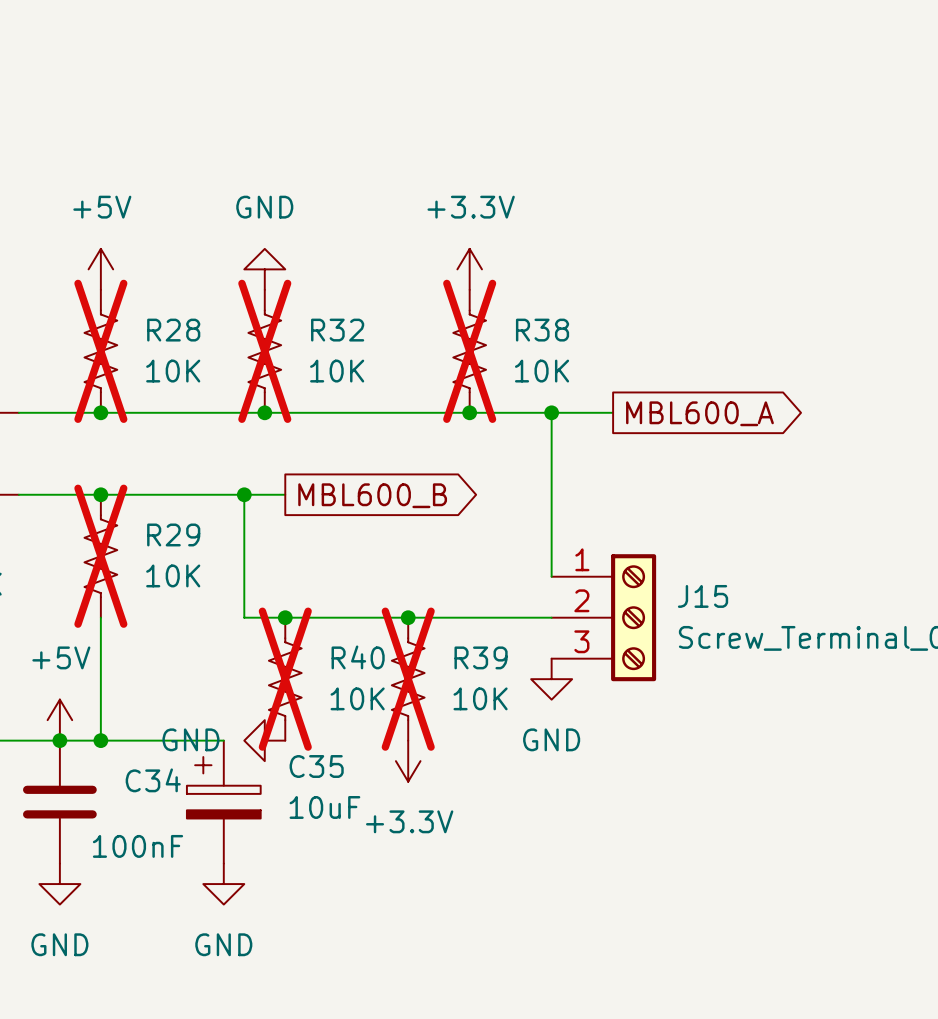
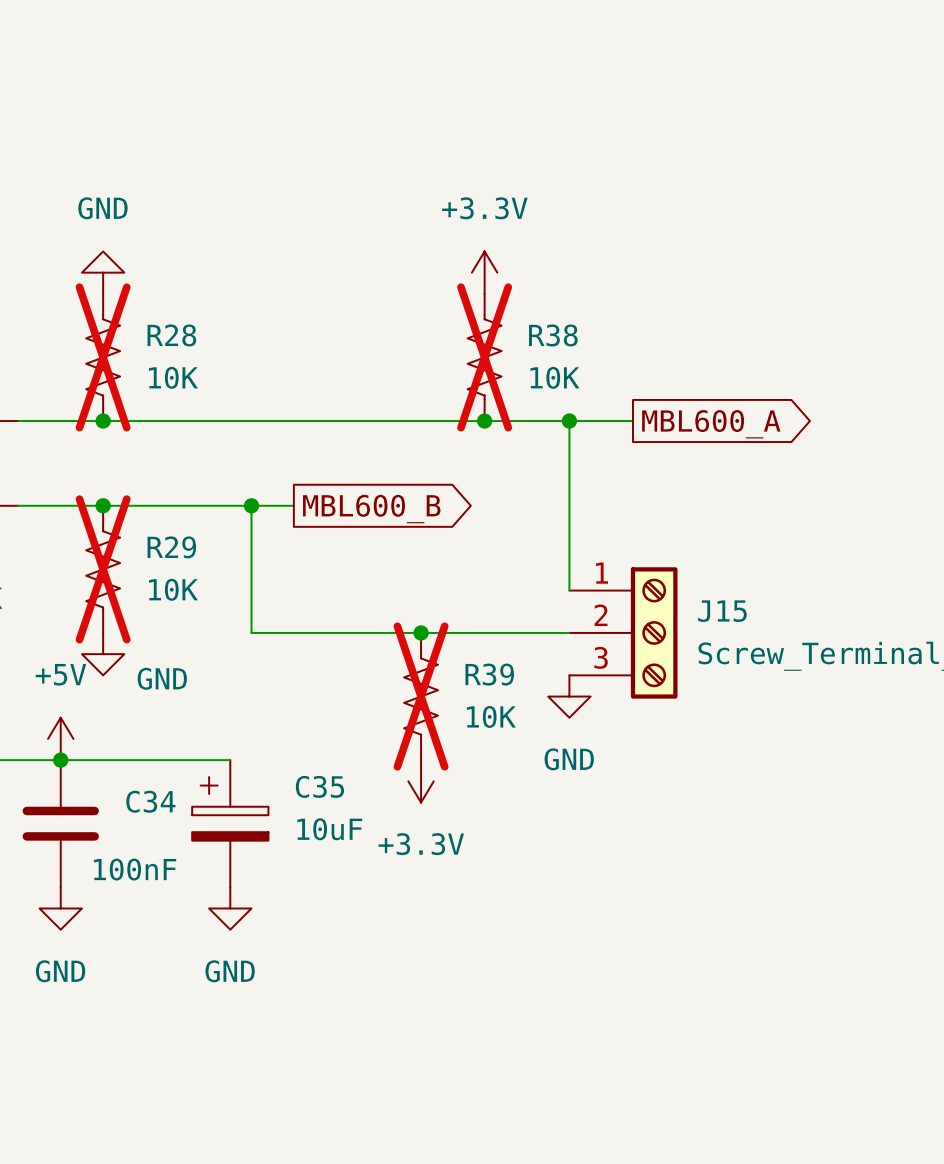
power symbol: +5V (100, 269) -> GND (103, 272)
power symbol: GND (264, 269) -> none
R32: 10K (264, 351) -> none
junction: (264, 412) -> none
wire: (100, 617) (100, 740) -> none
junction: (285, 617) -> none
R40: 10K (285, 679) -> none
power symbol text position: GND (190, 739) -> GND (162, 678)
junction: (100, 740) -> none
power symbol rotation: 0° (264, 740) -> 90° counterclockwise (103, 654)
power symbol position: GND (264, 740) -> GND (103, 654)

